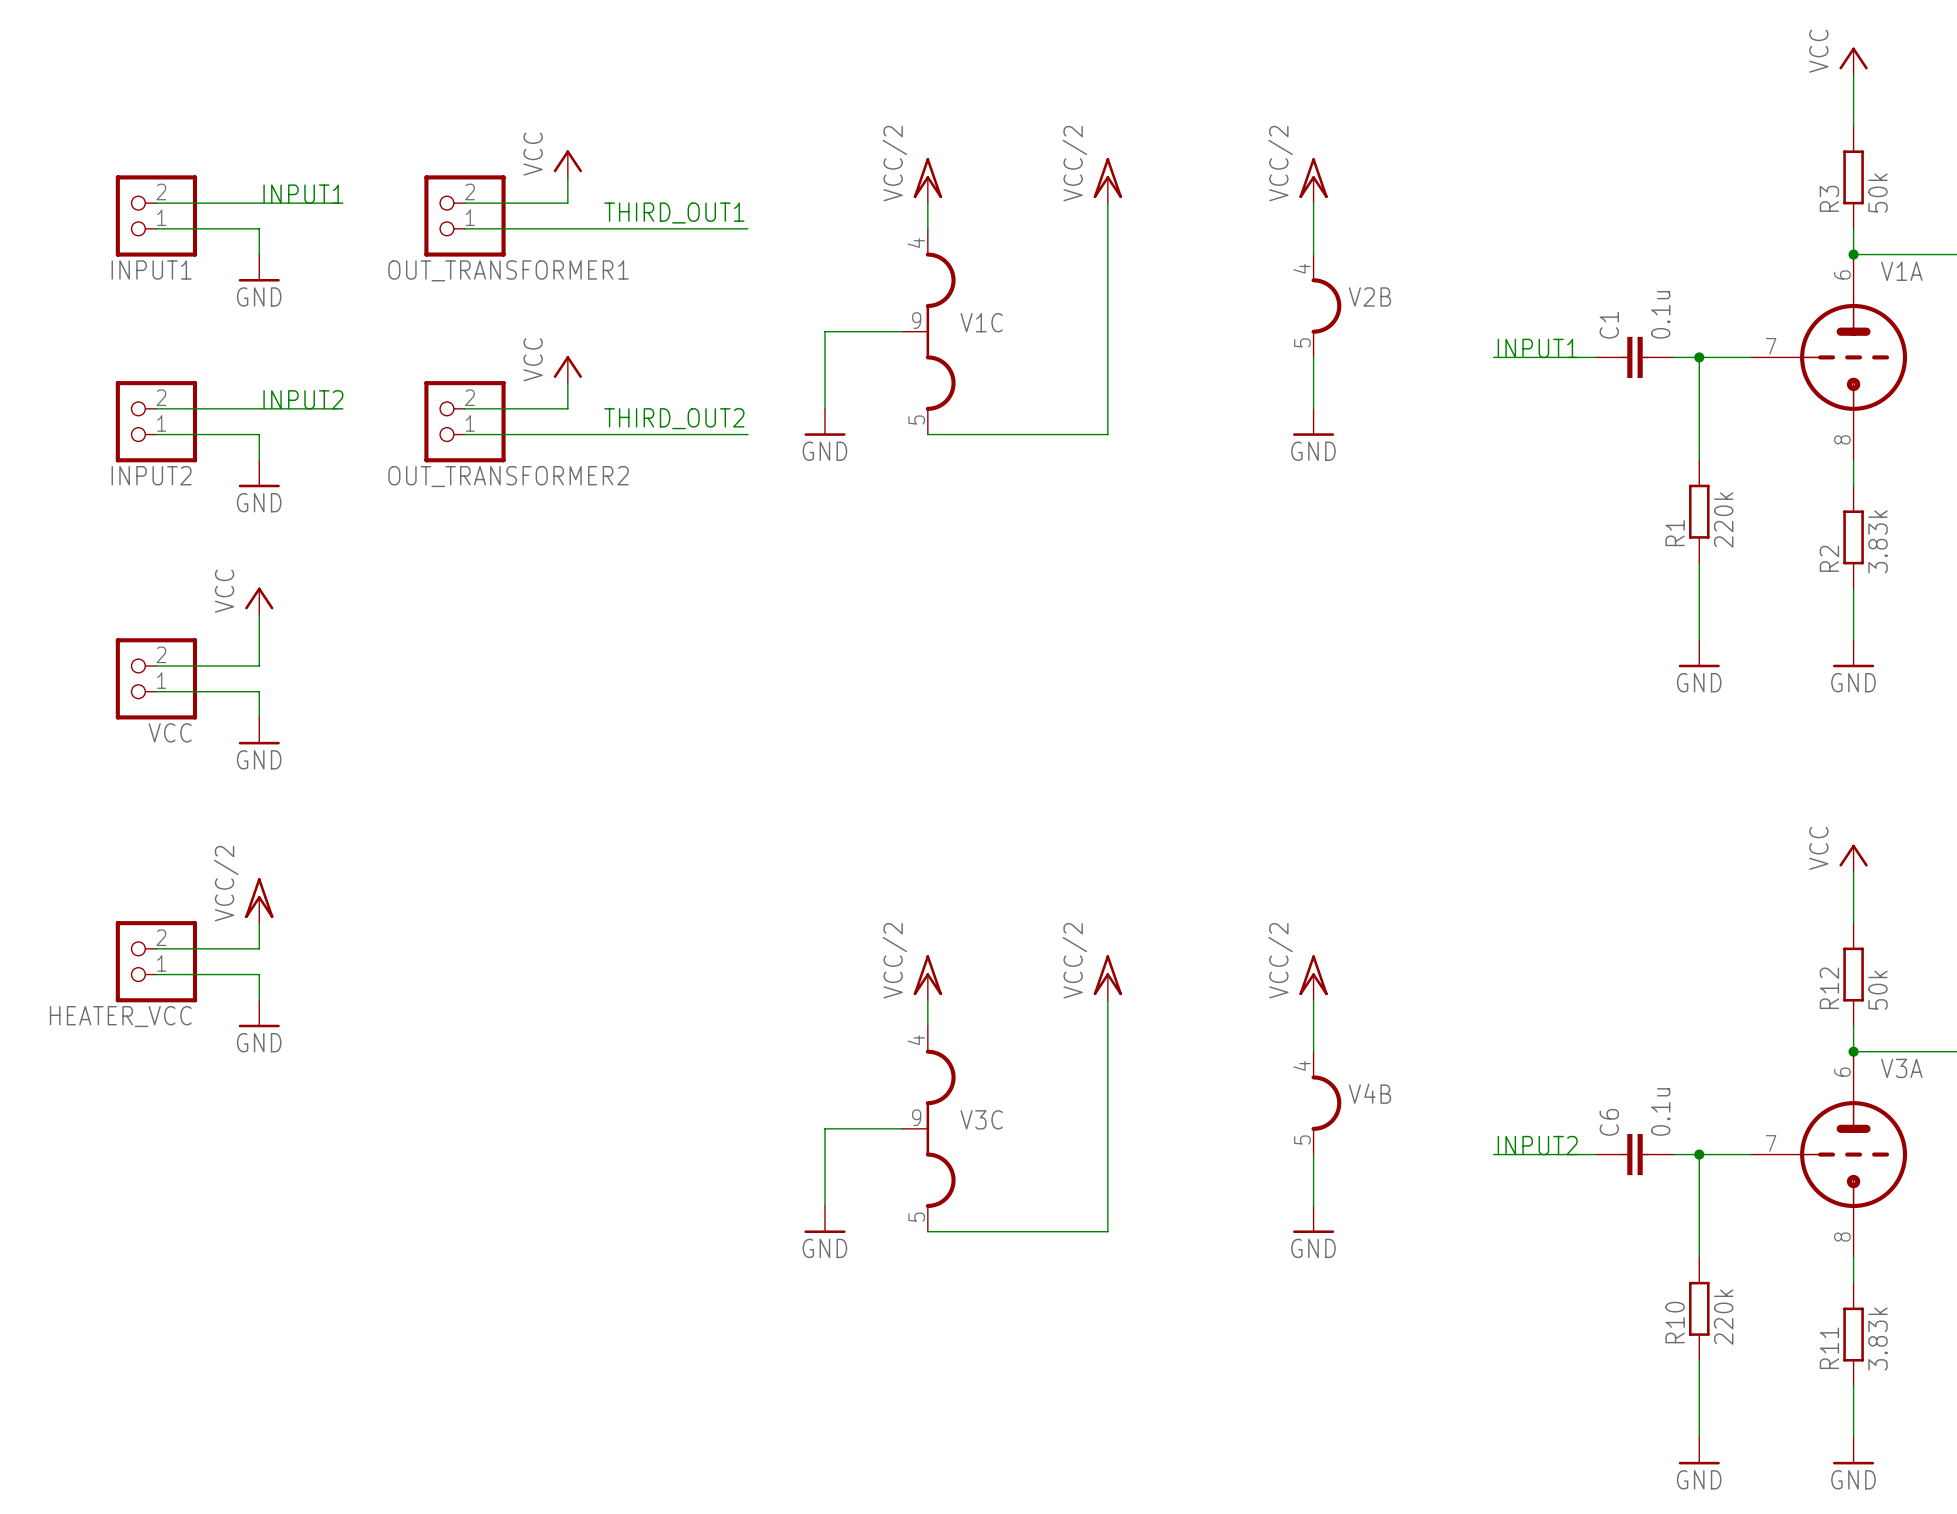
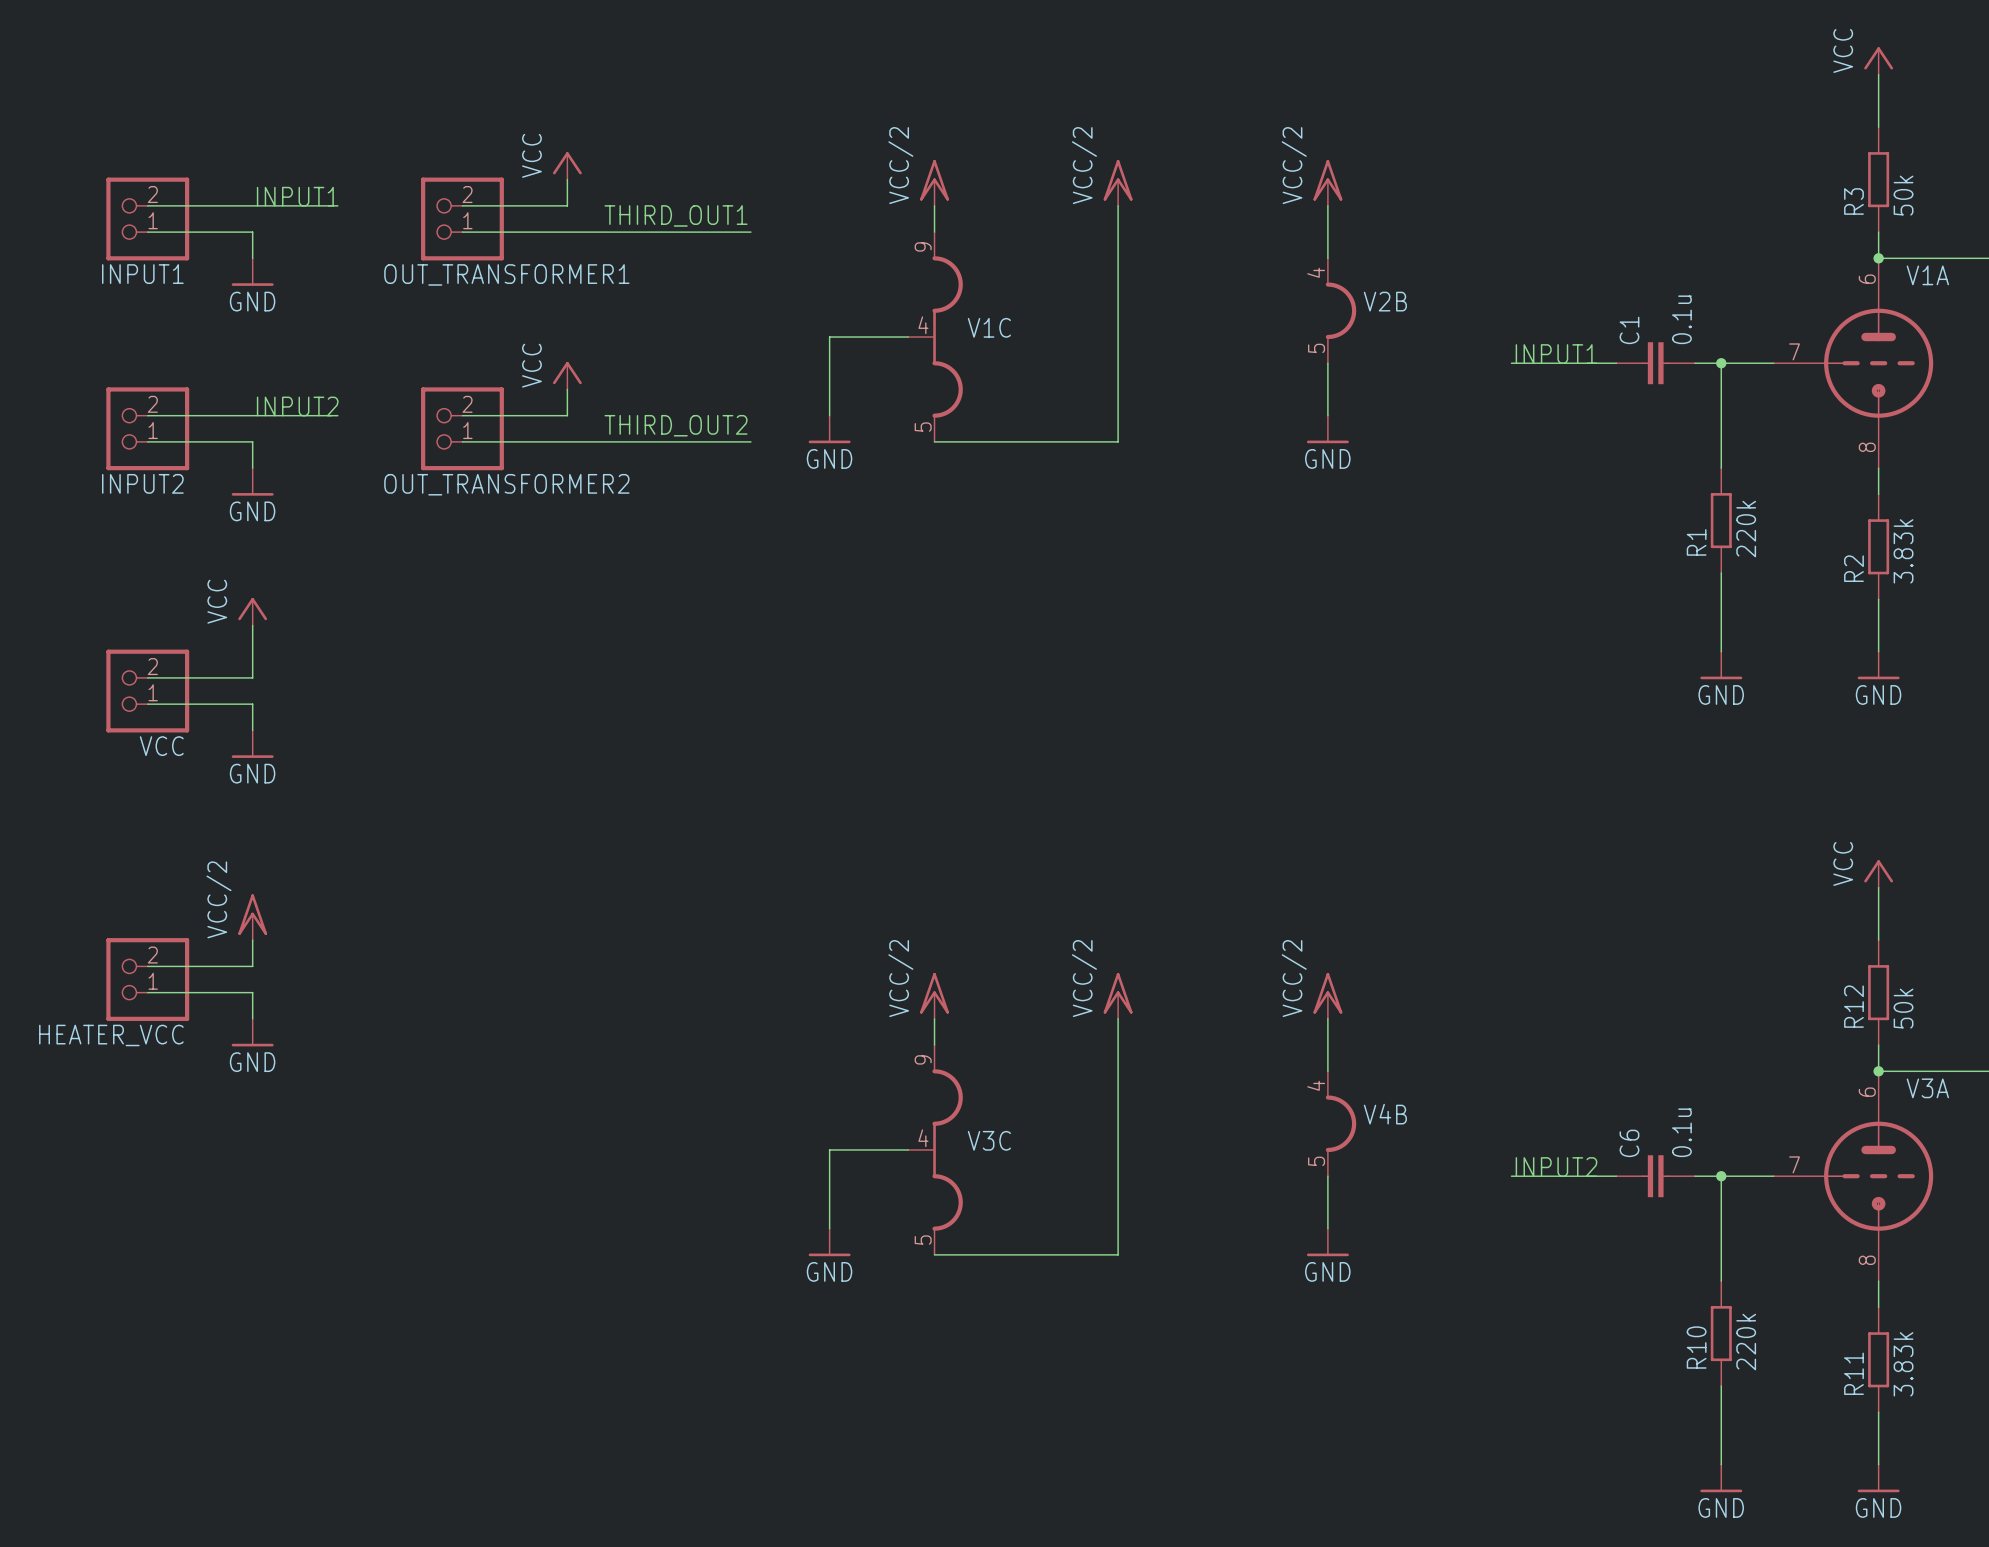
V1C pin number: 4 (916, 243) -> 9 (923, 246)
V1C pin number: 9 (916, 320) -> 4 (923, 325)
V3C pin number: 4 (916, 1040) -> 9 (923, 1059)
V3C pin number: 9 (916, 1117) -> 4 (923, 1138)

